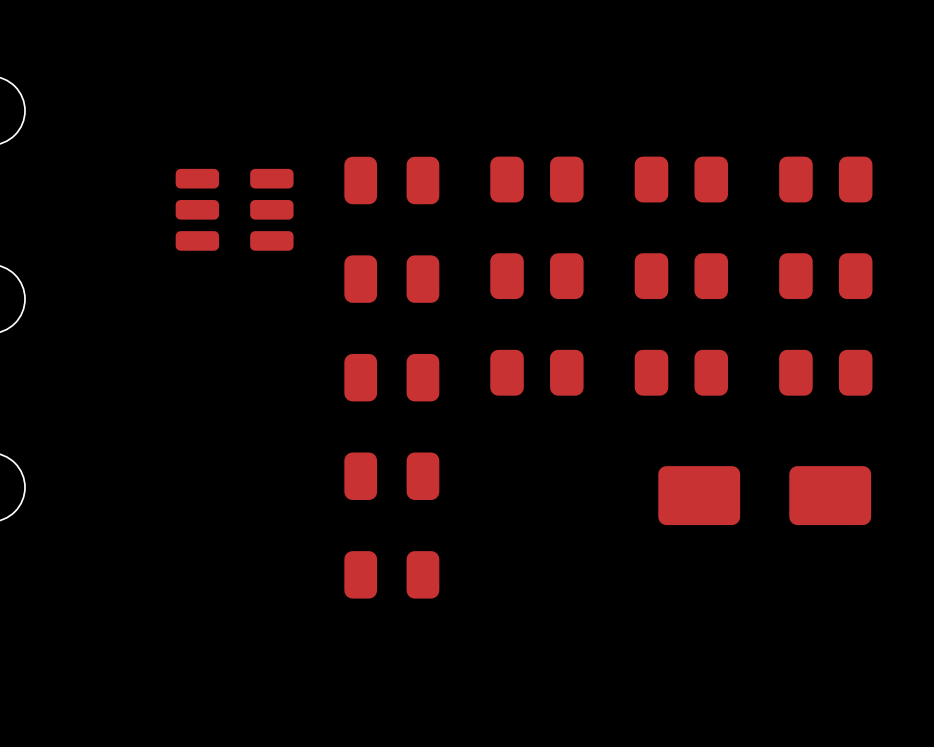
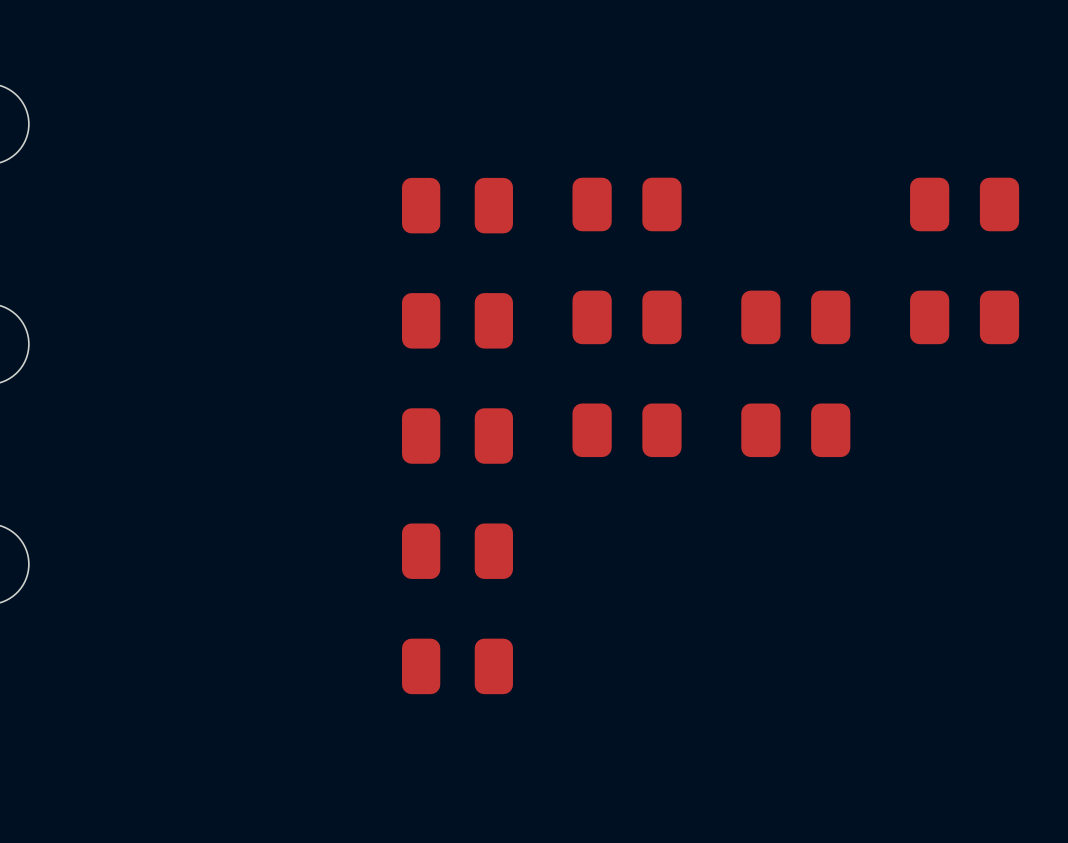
part: (681, 179) -> none
part: (234, 209) -> none
part: (825, 372) -> none
part: (764, 495) -> none

